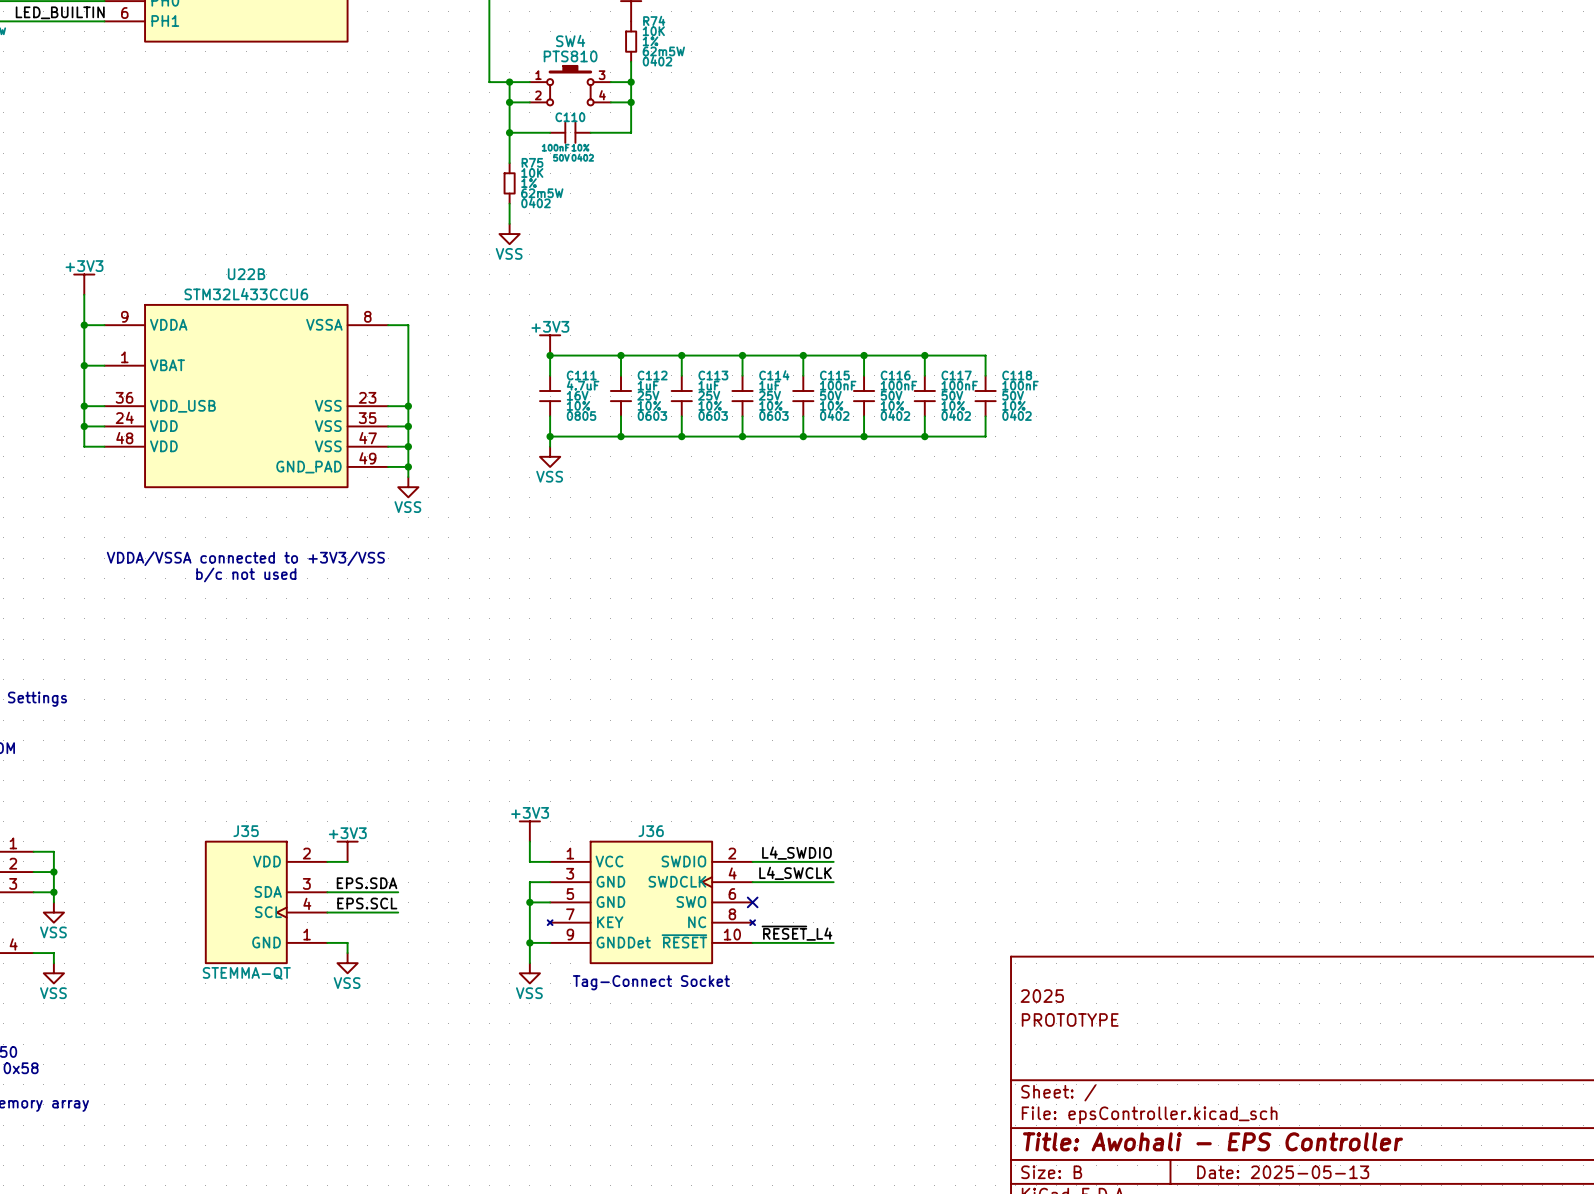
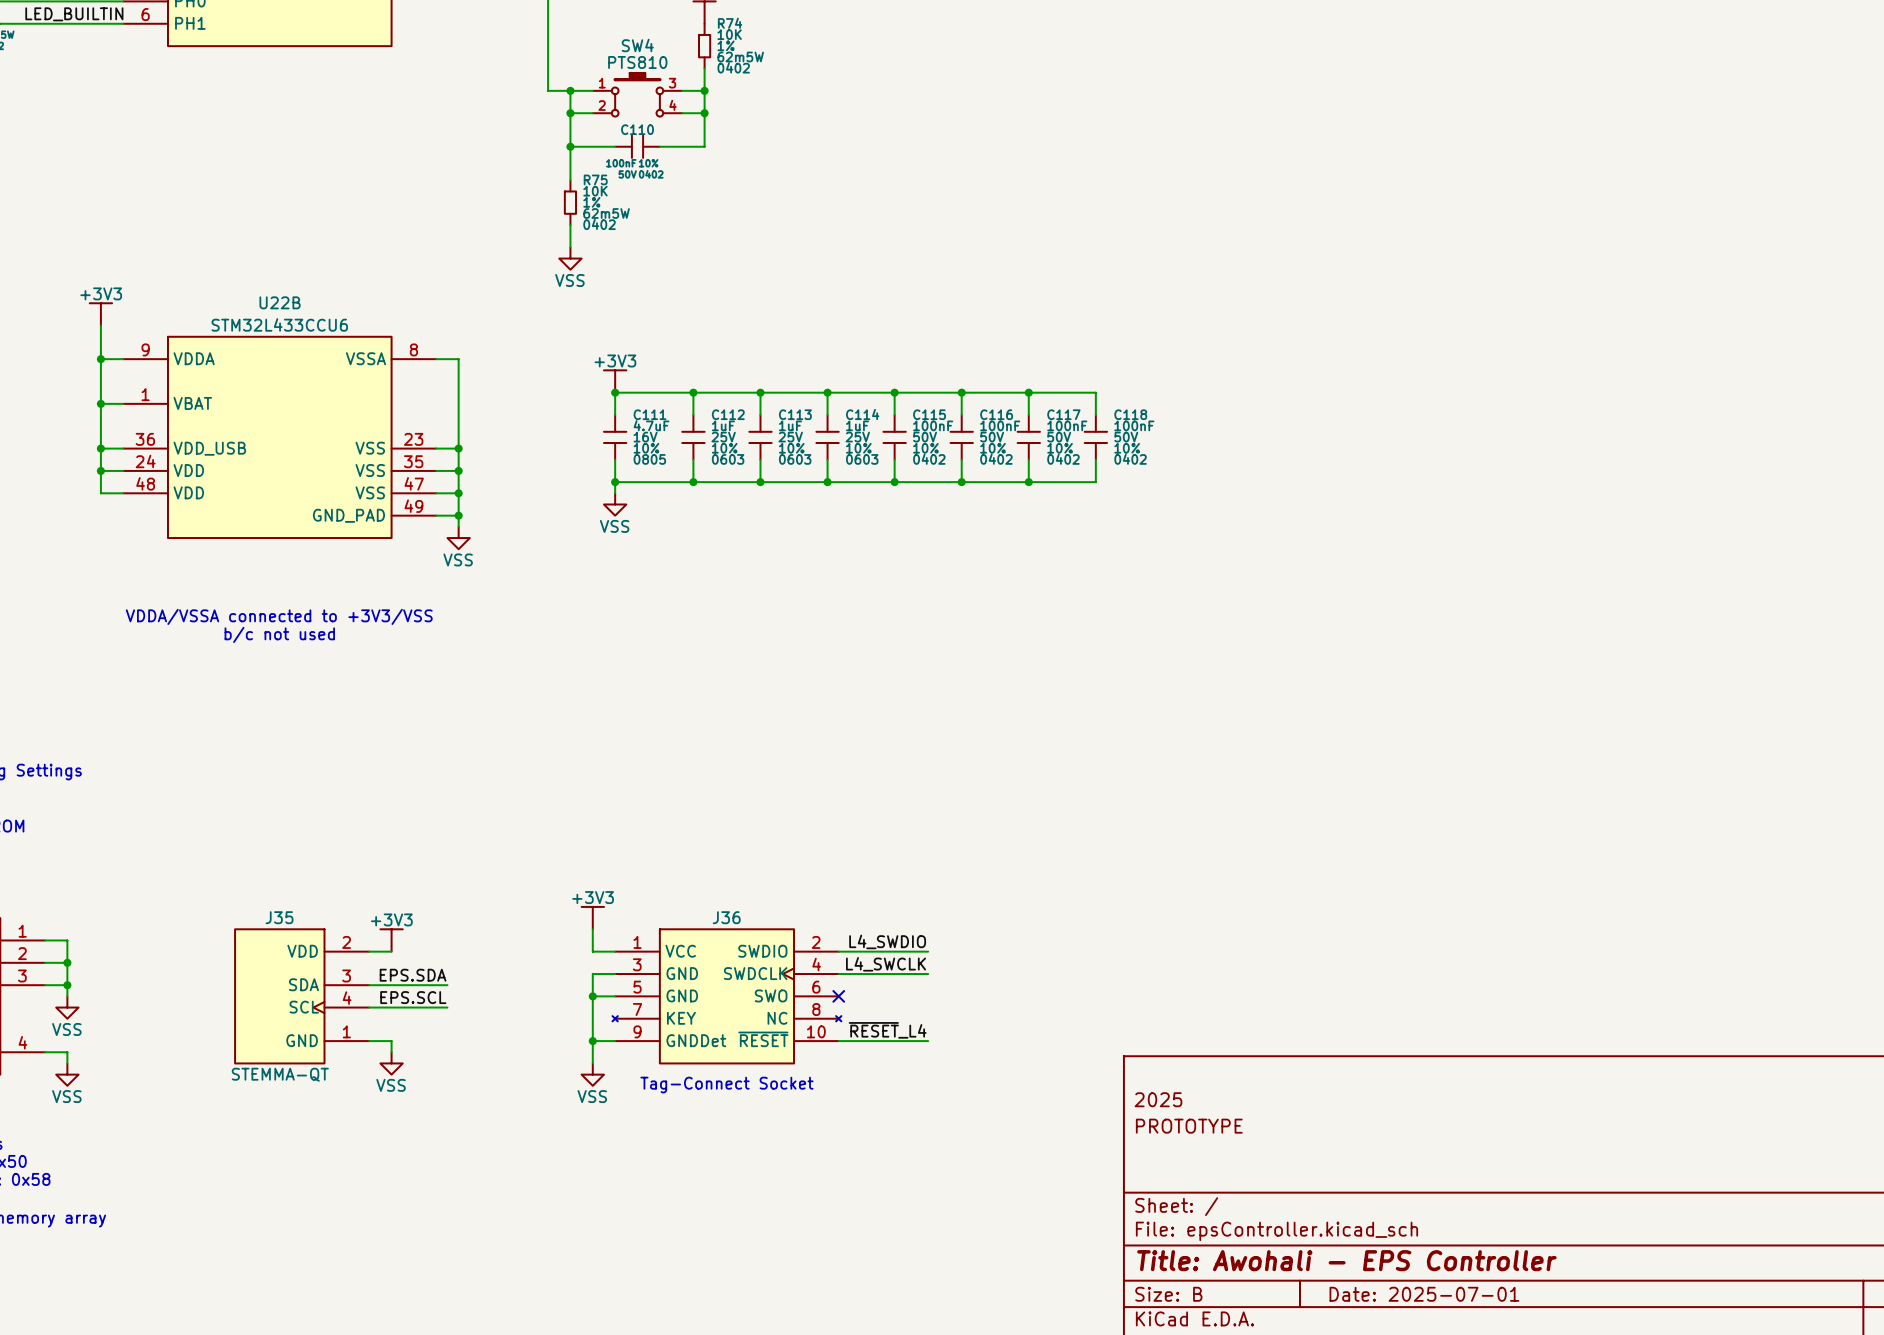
title block: Date: 2025-05-13 (1283, 1172) -> Date: 2025-07-01 (1424, 1294)

